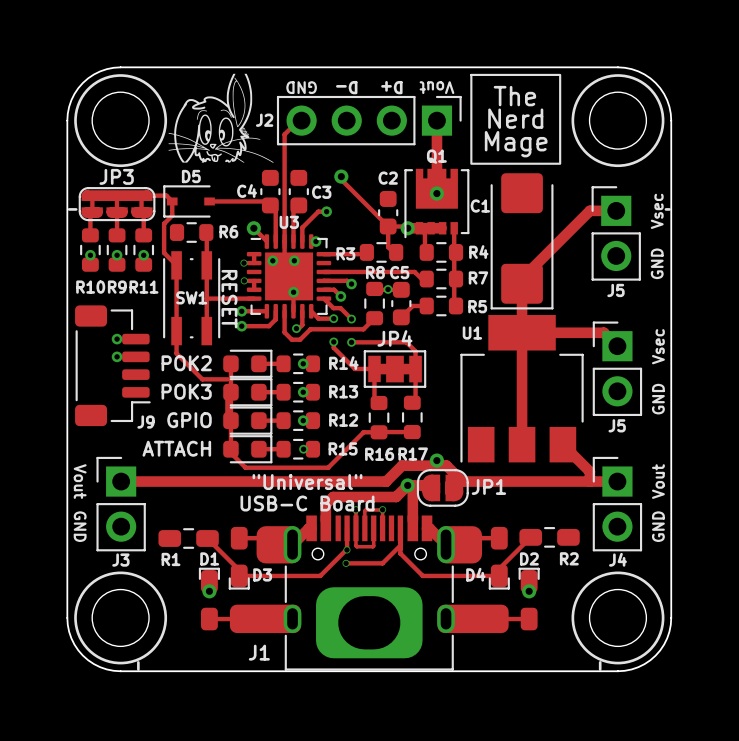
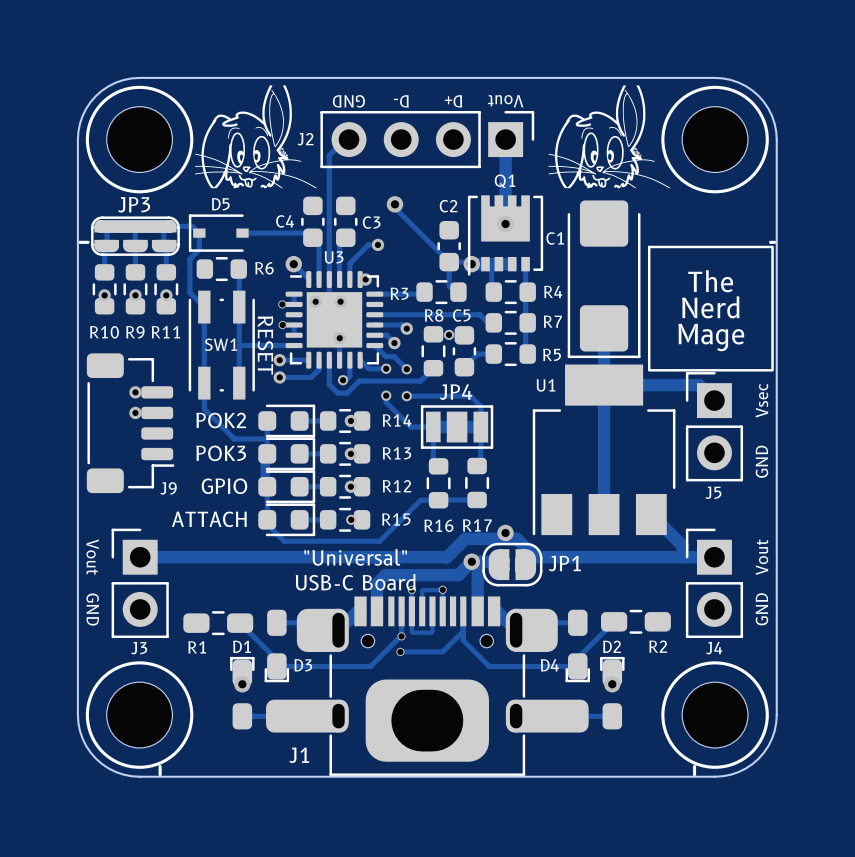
drawing shape: [470, 73, 562, 165] -> [548, 85, 671, 189]
track: (616, 210) (589, 210) (522, 278) (522, 283) -> none
text: Vsec (657, 211) -> none
drawing: none -> [647, 245, 774, 372]
J5: (616, 233) -> none
text: GND (657, 263) -> none

